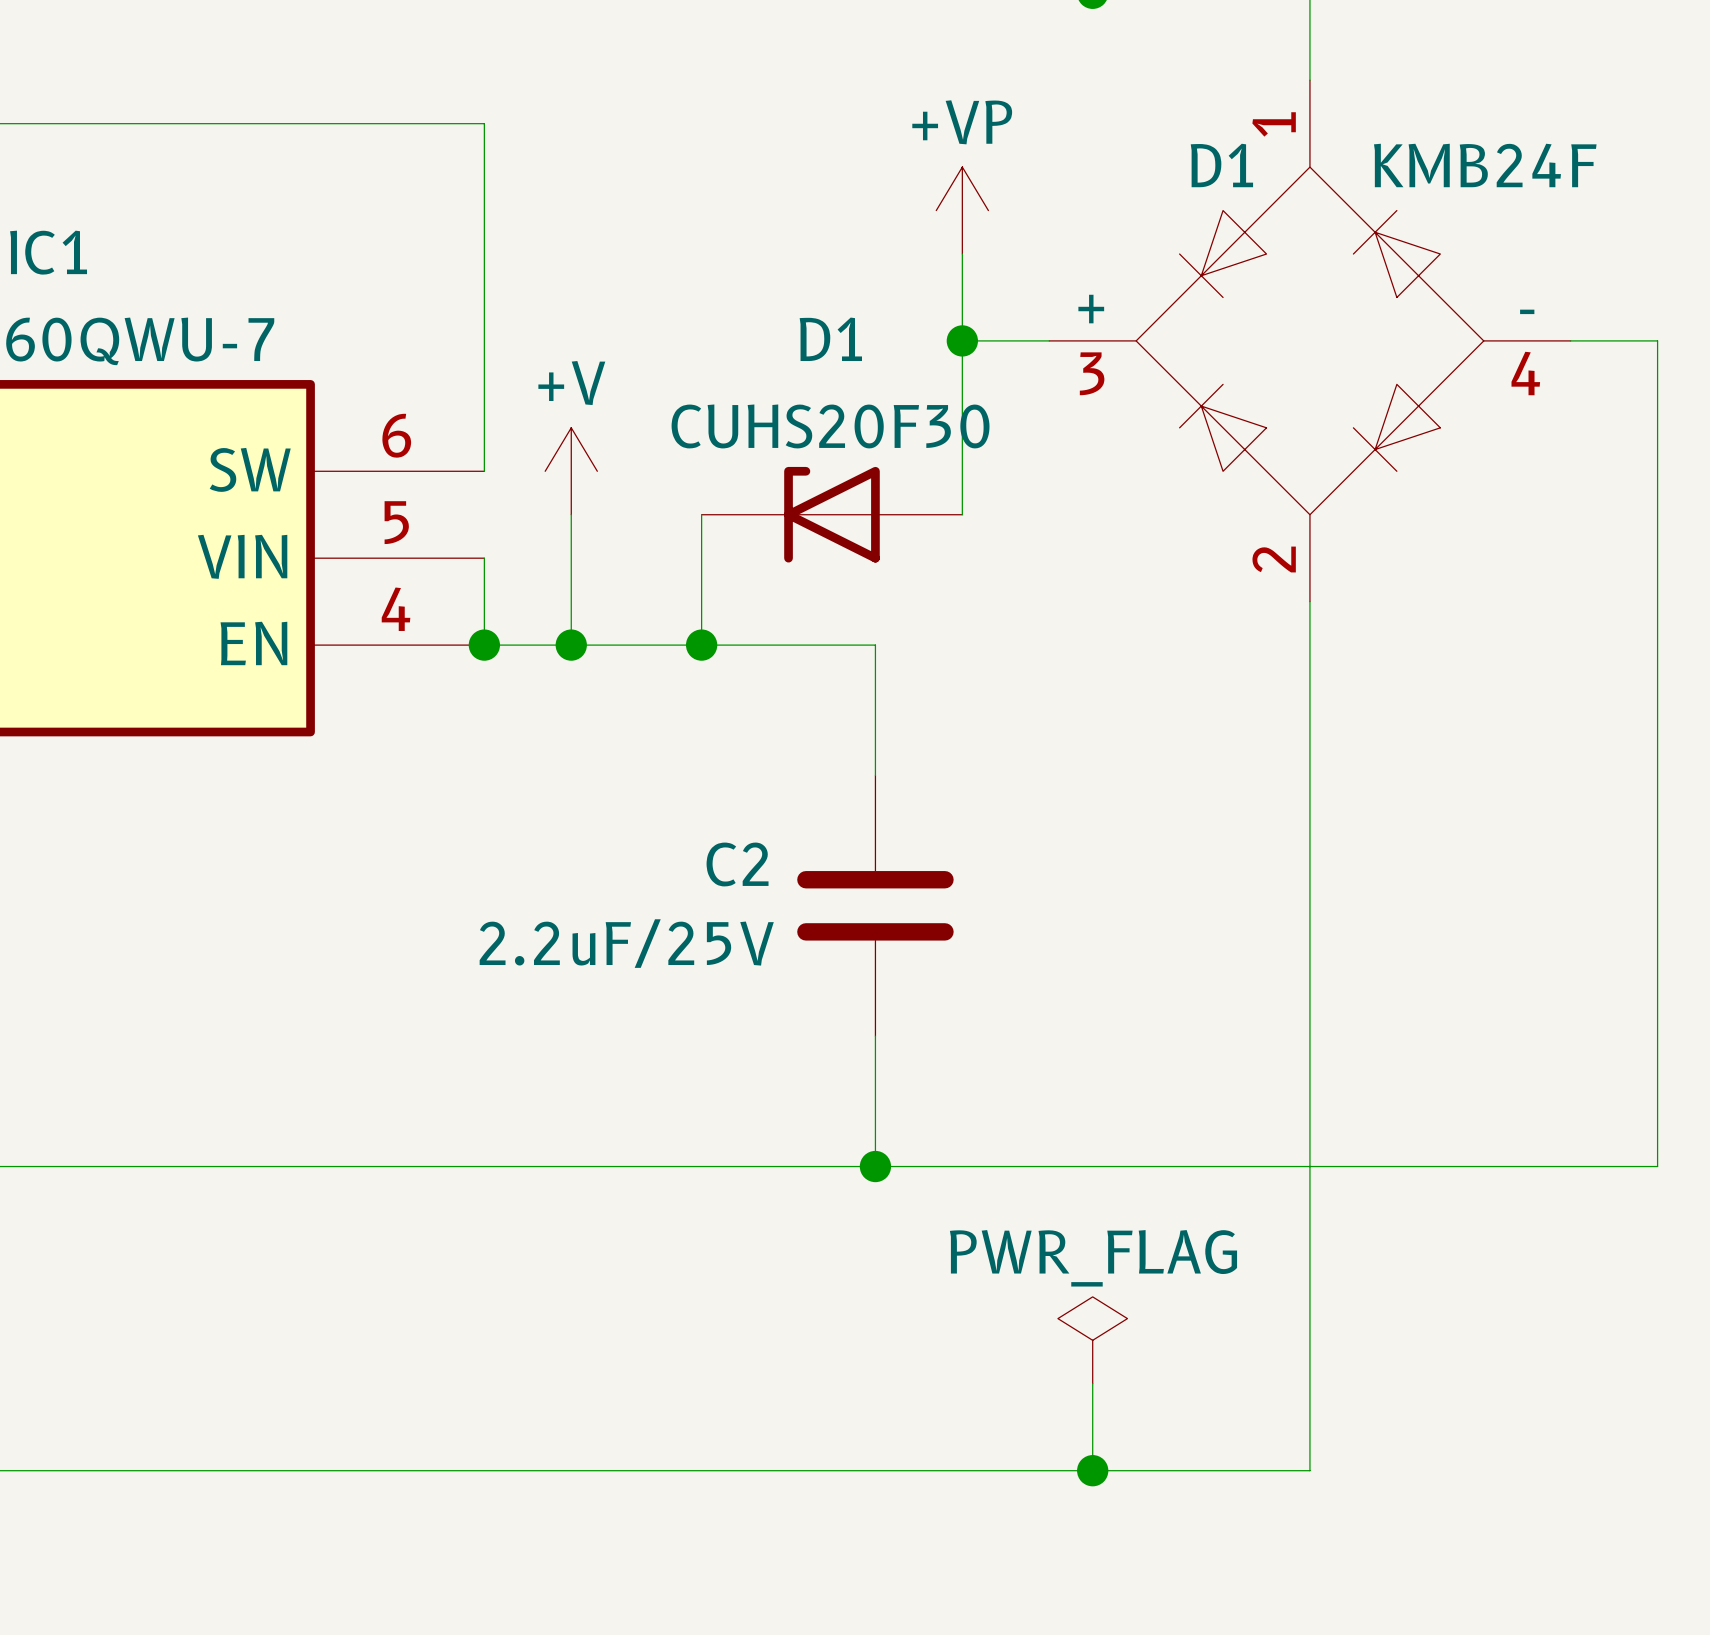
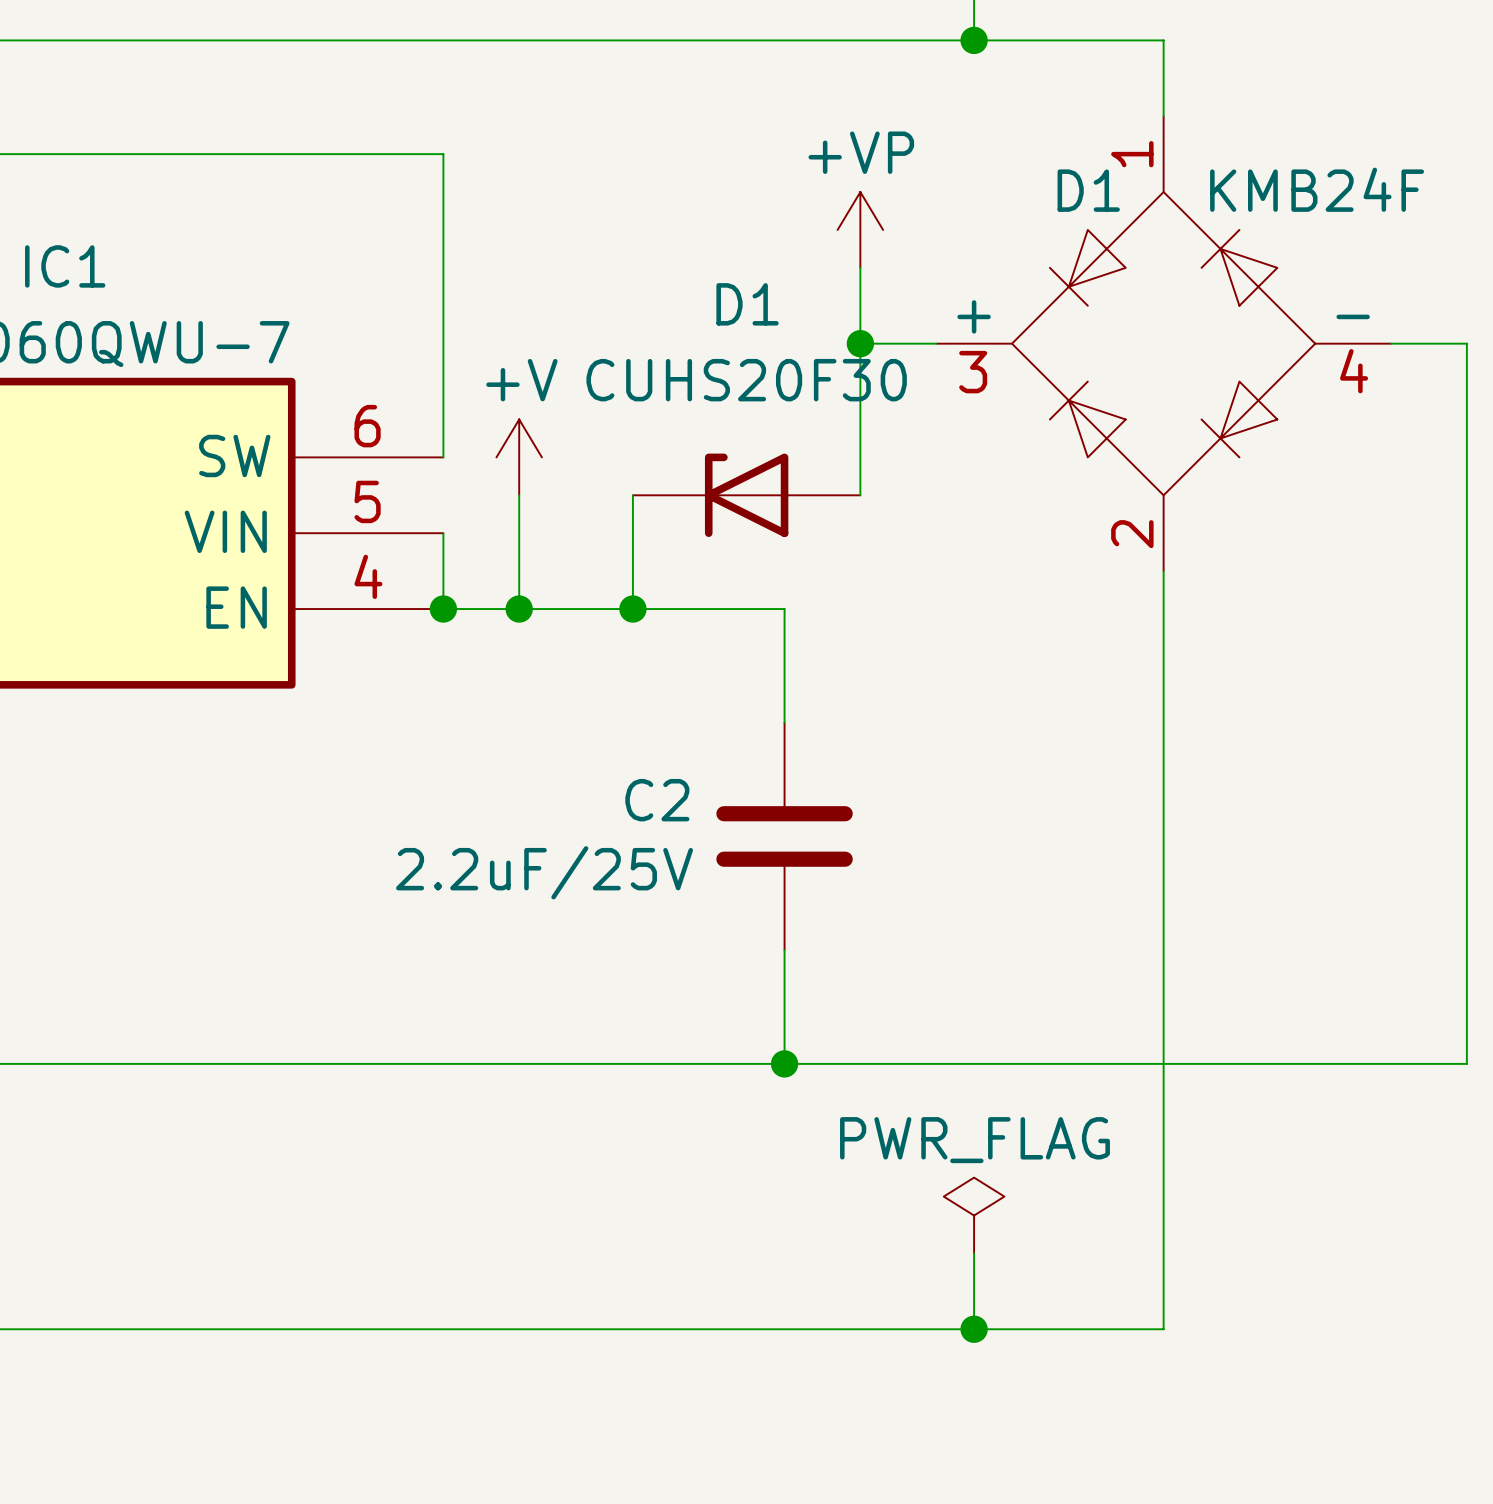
D1 name position: D1 (830, 339) -> D1 (747, 304)
D1 value position: CUHS20F30 (830, 426) -> CUHS20F30 (746, 380)

